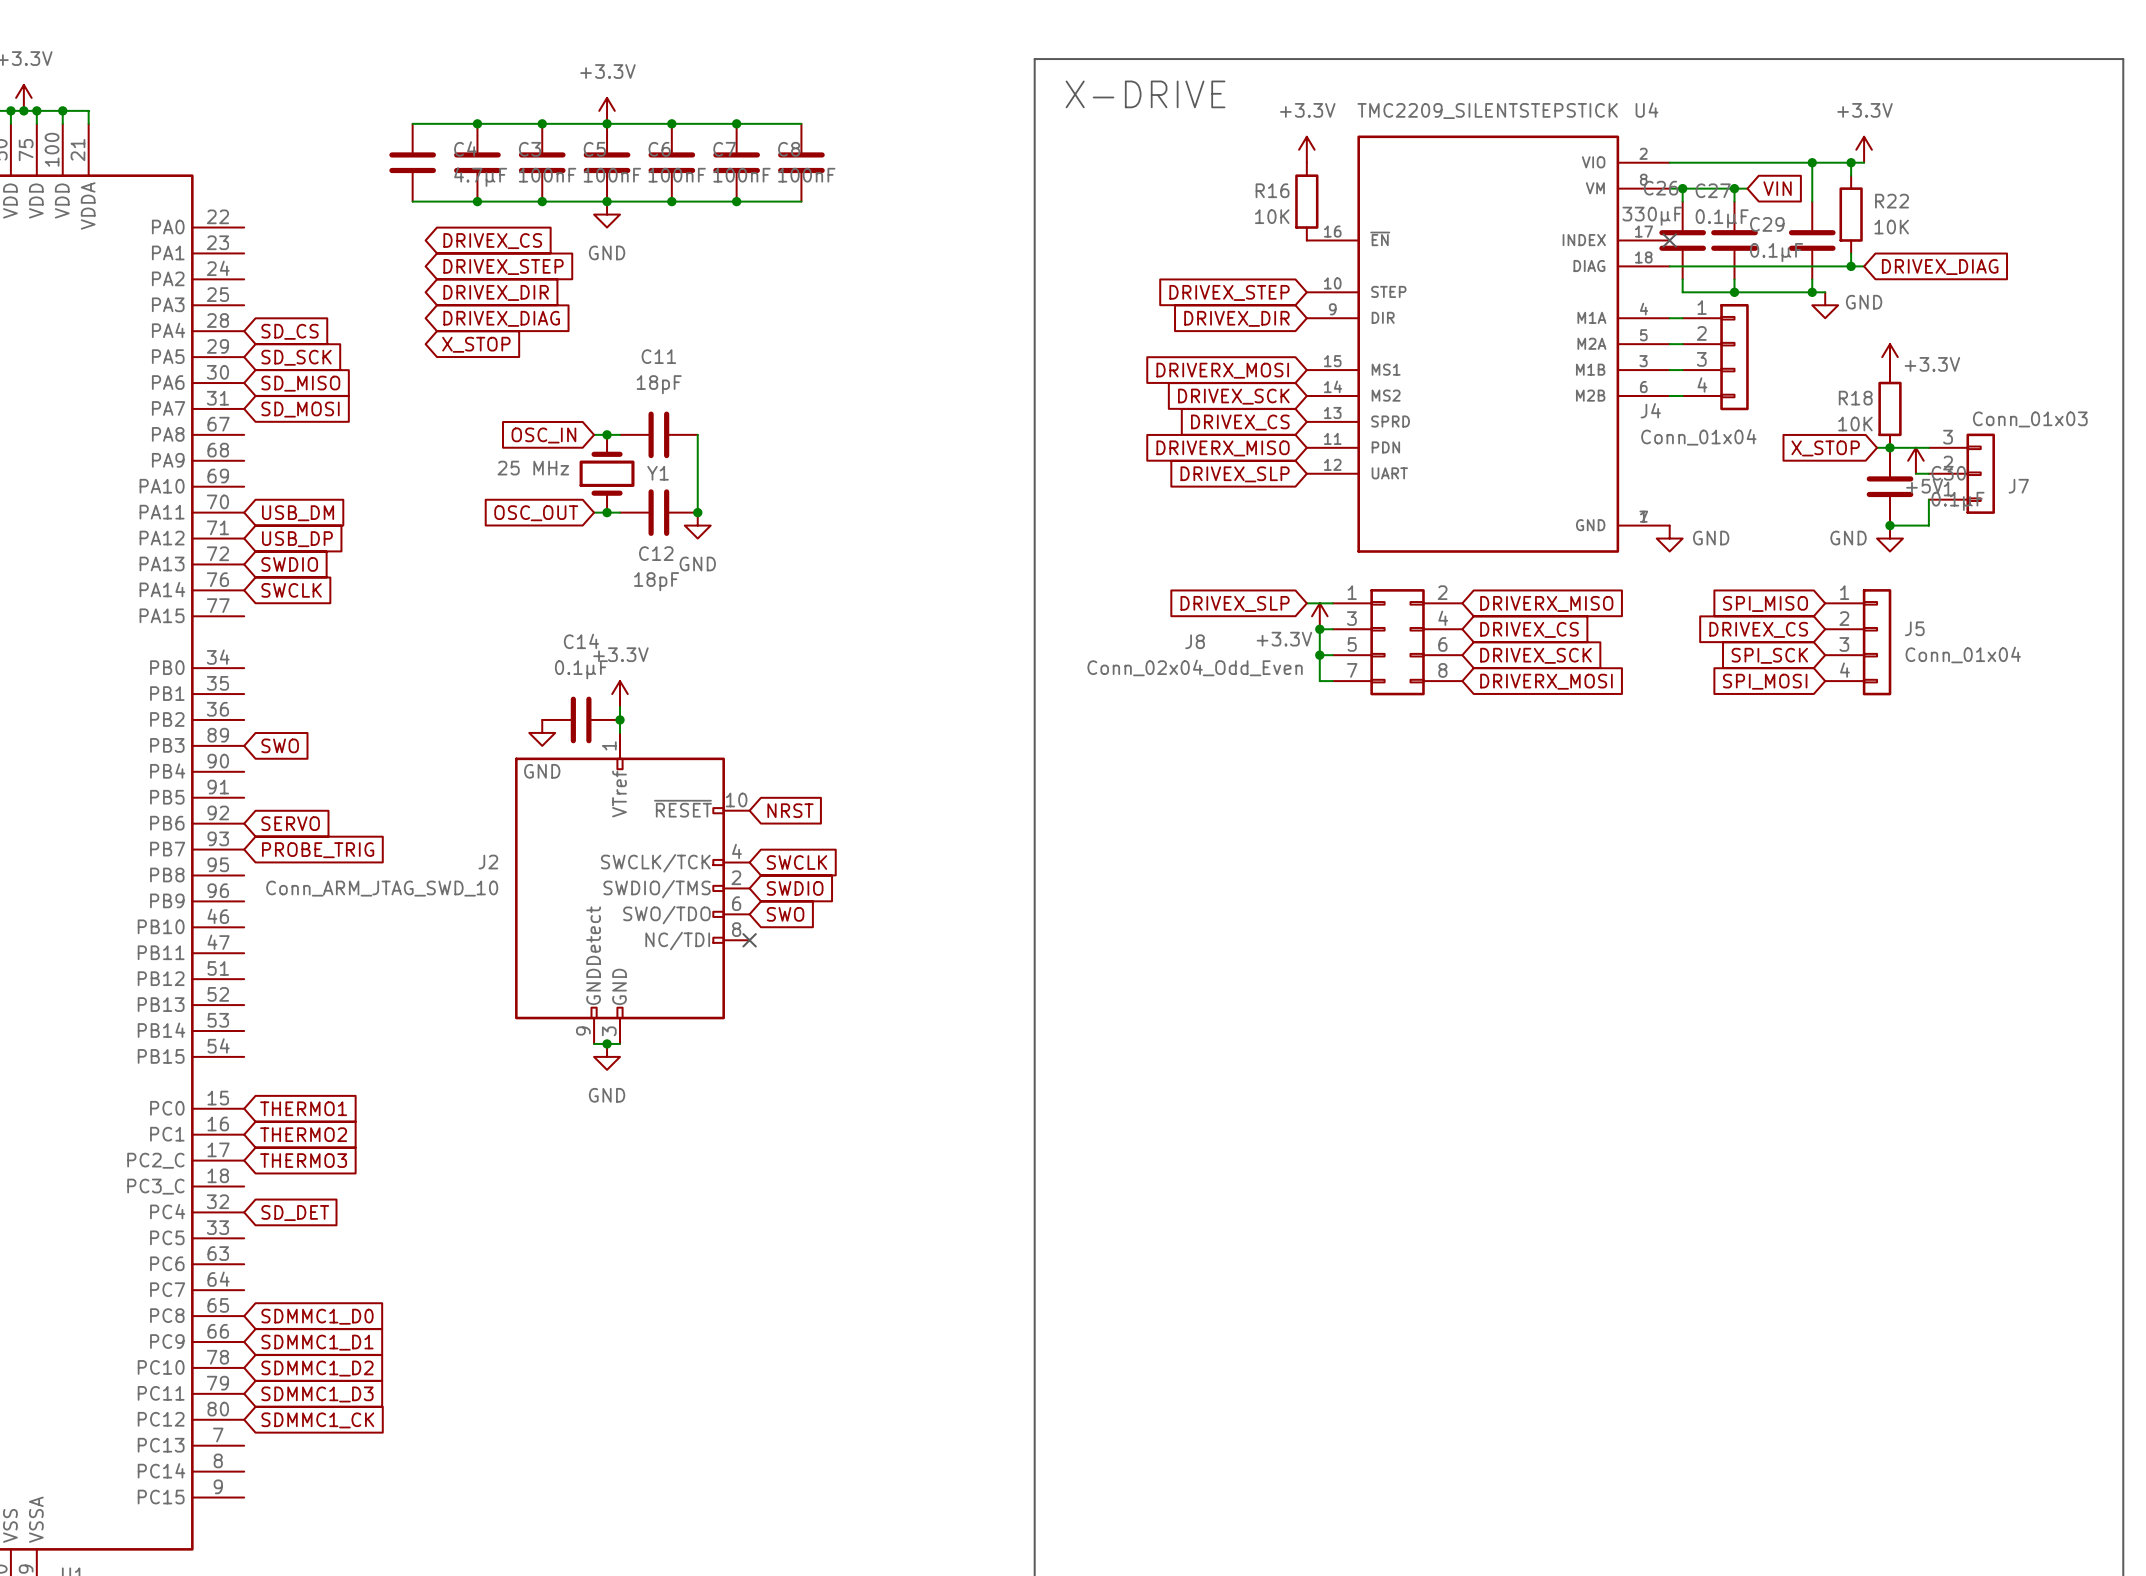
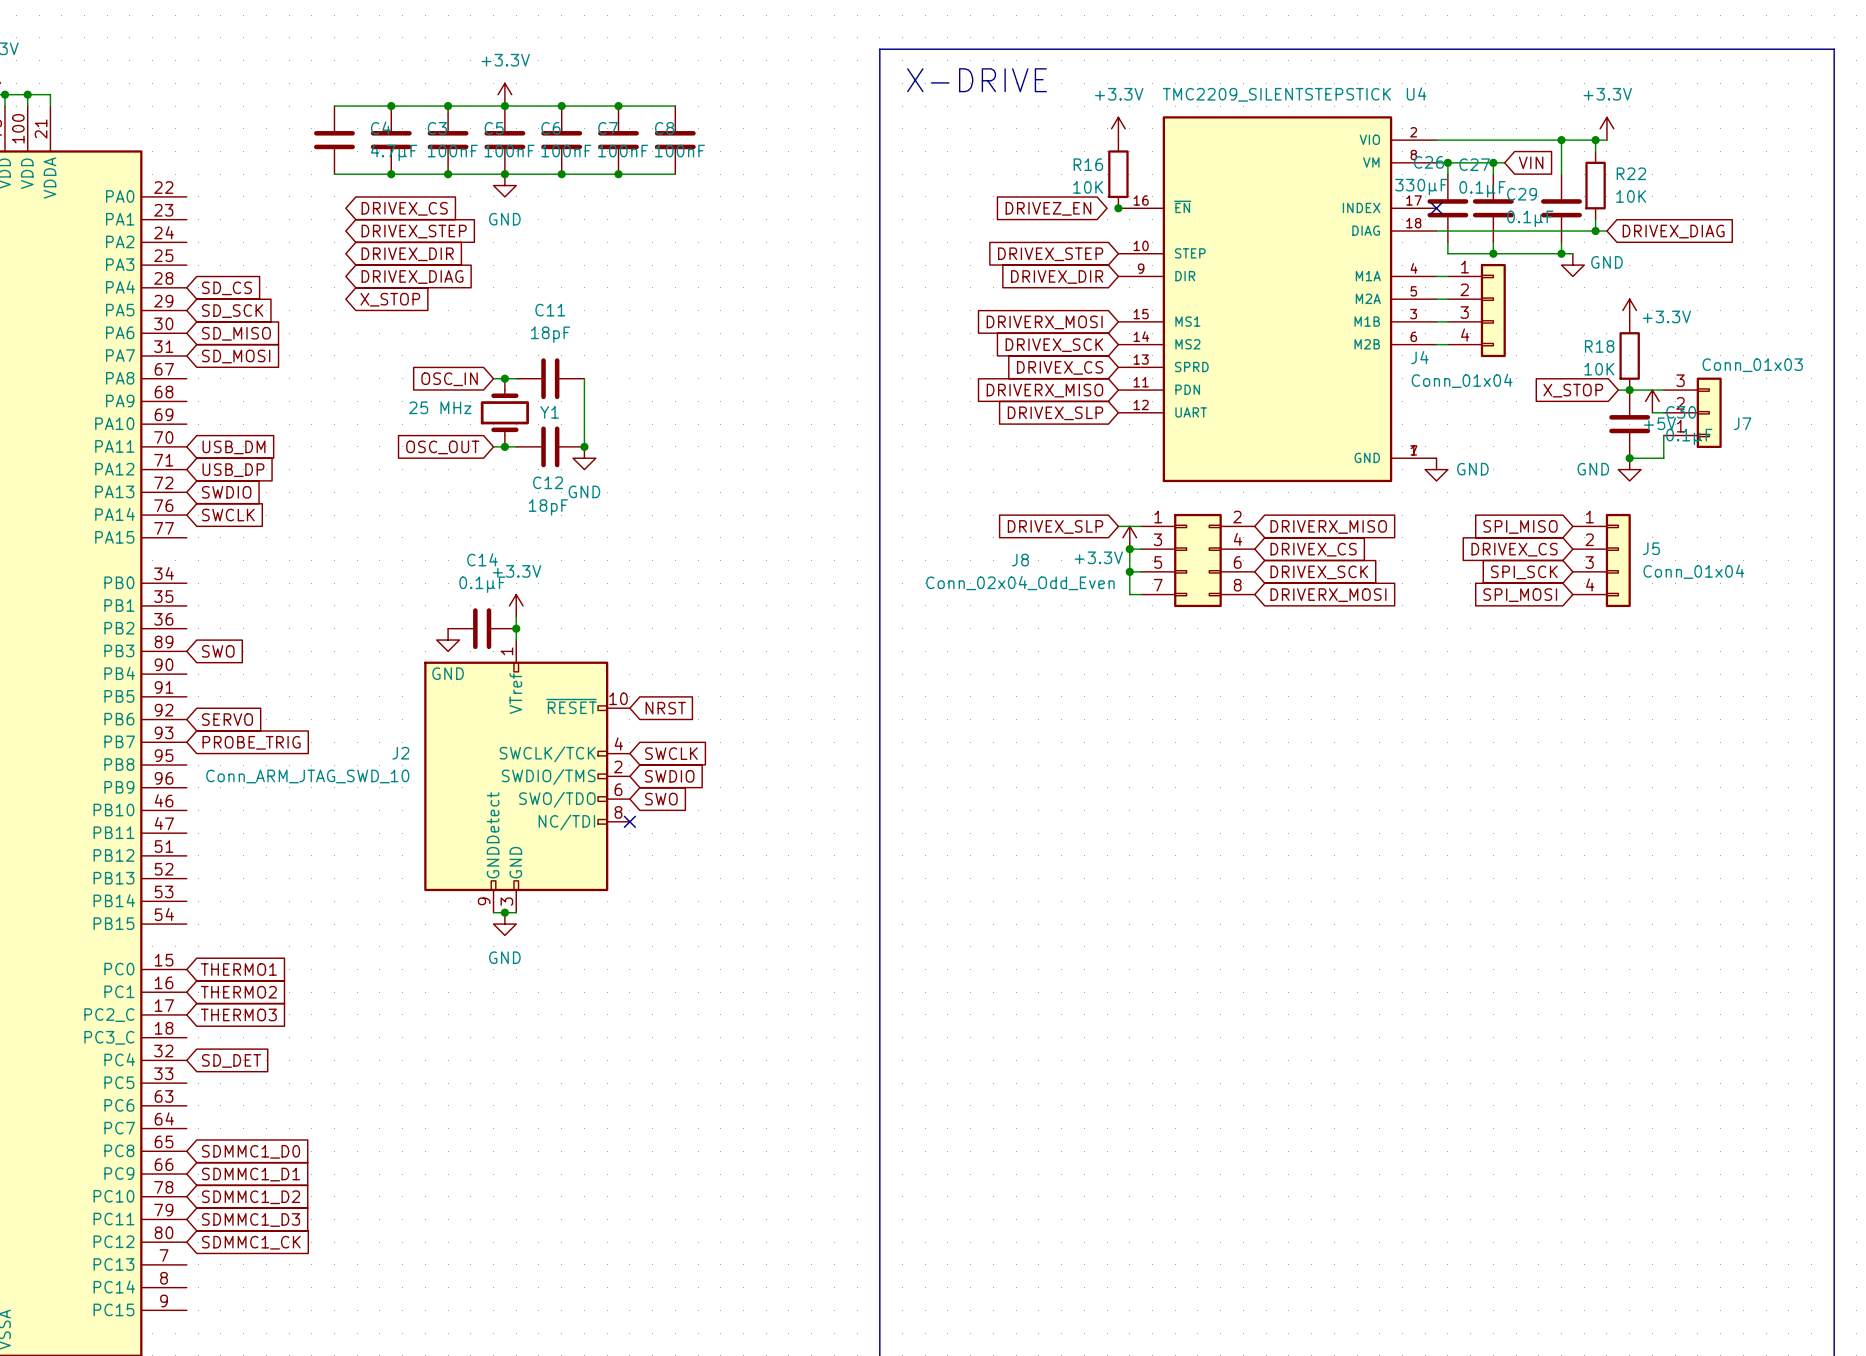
junction: none -> (1118, 208)
global label: none -> DRIVEZ_EN (1048, 208)

